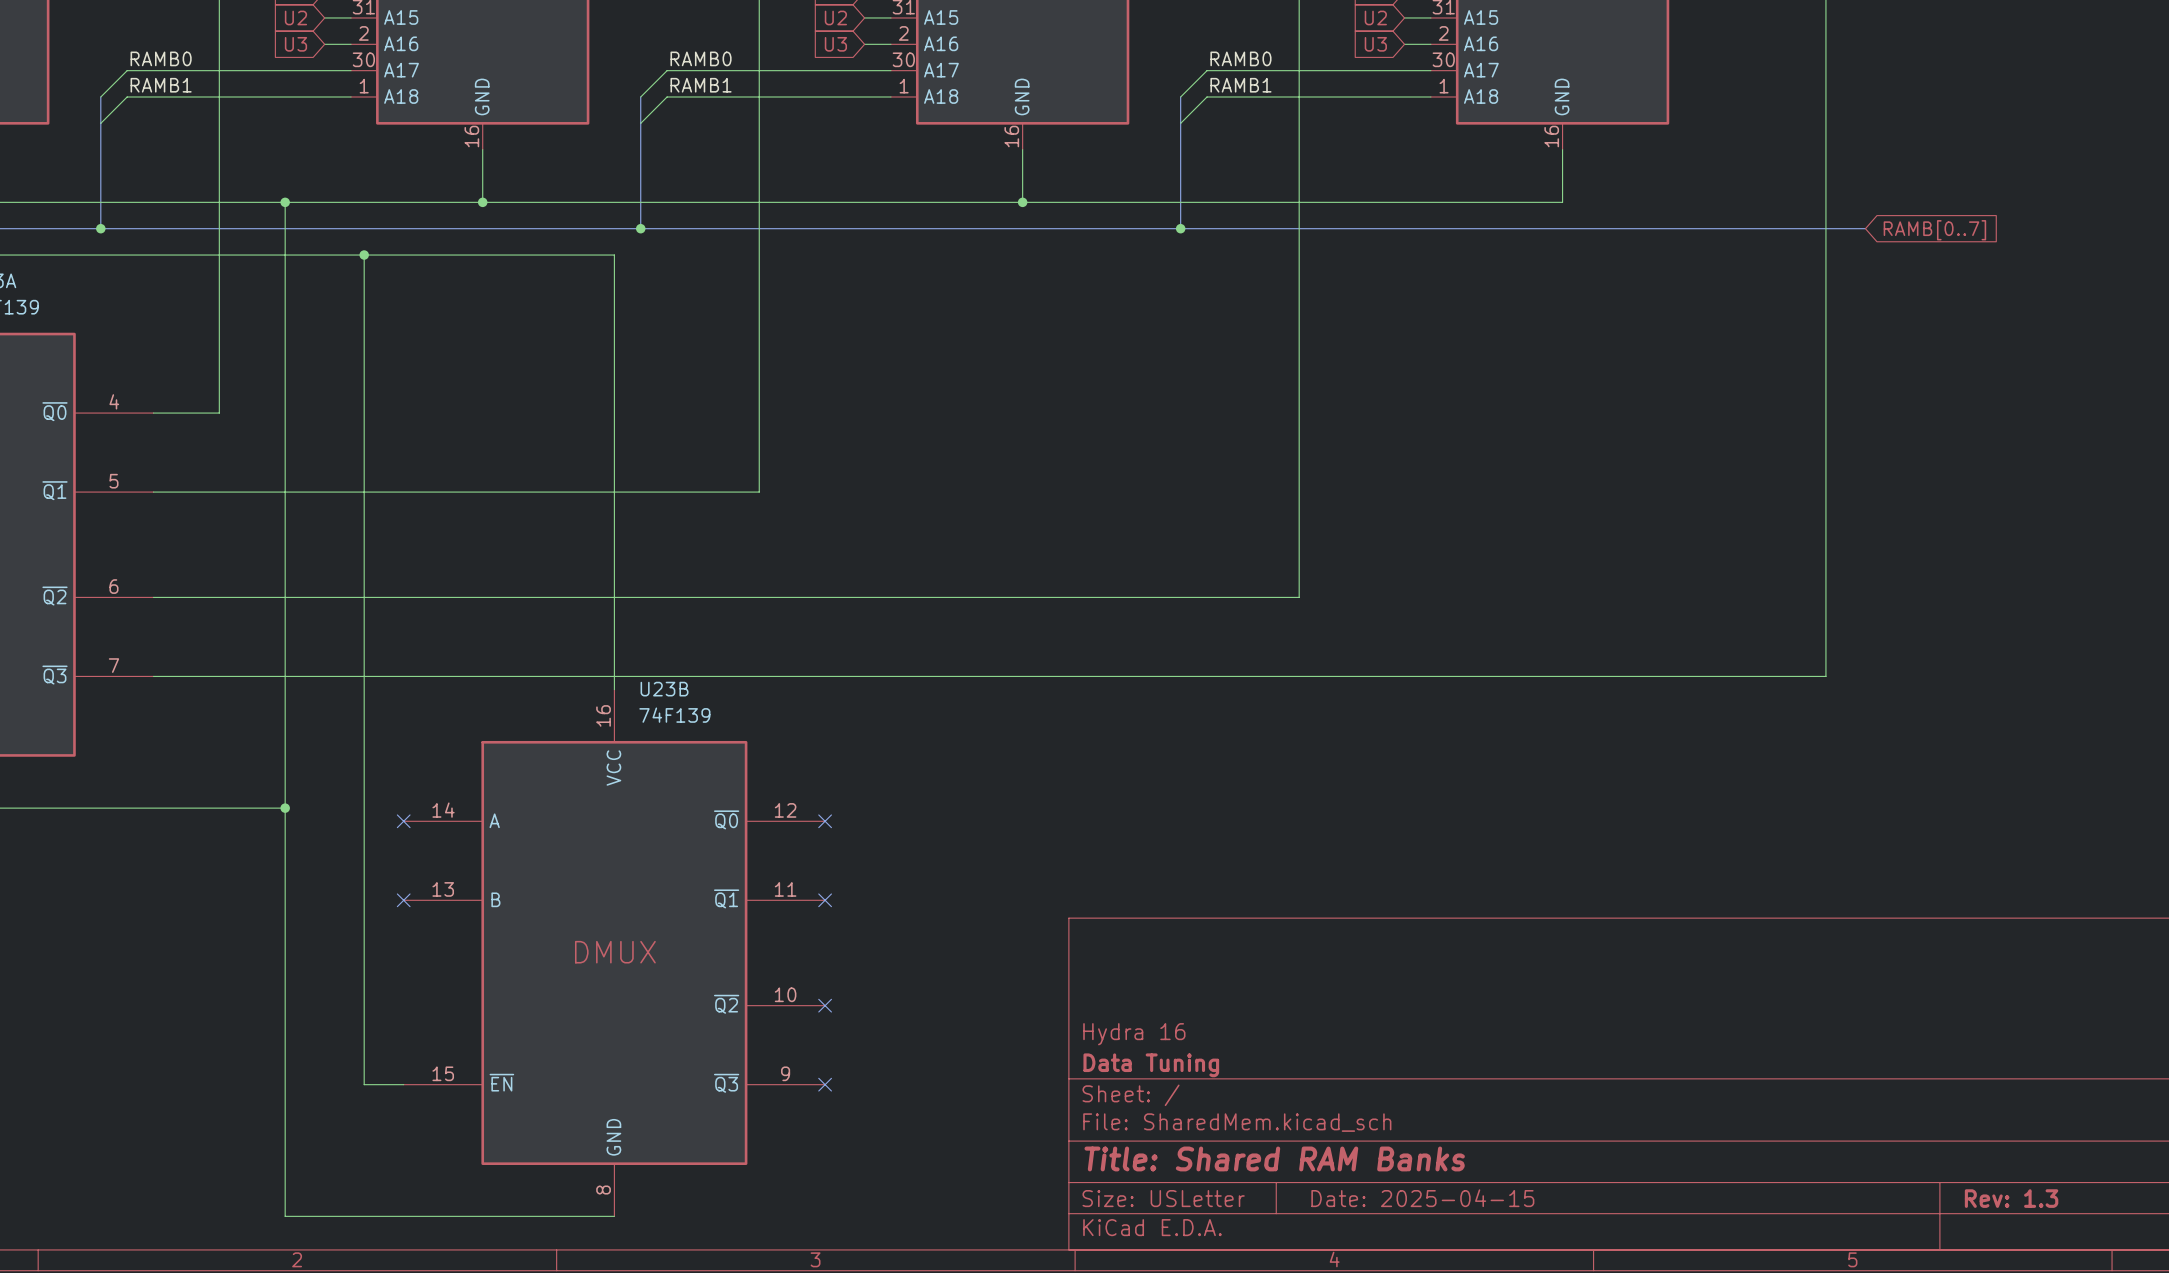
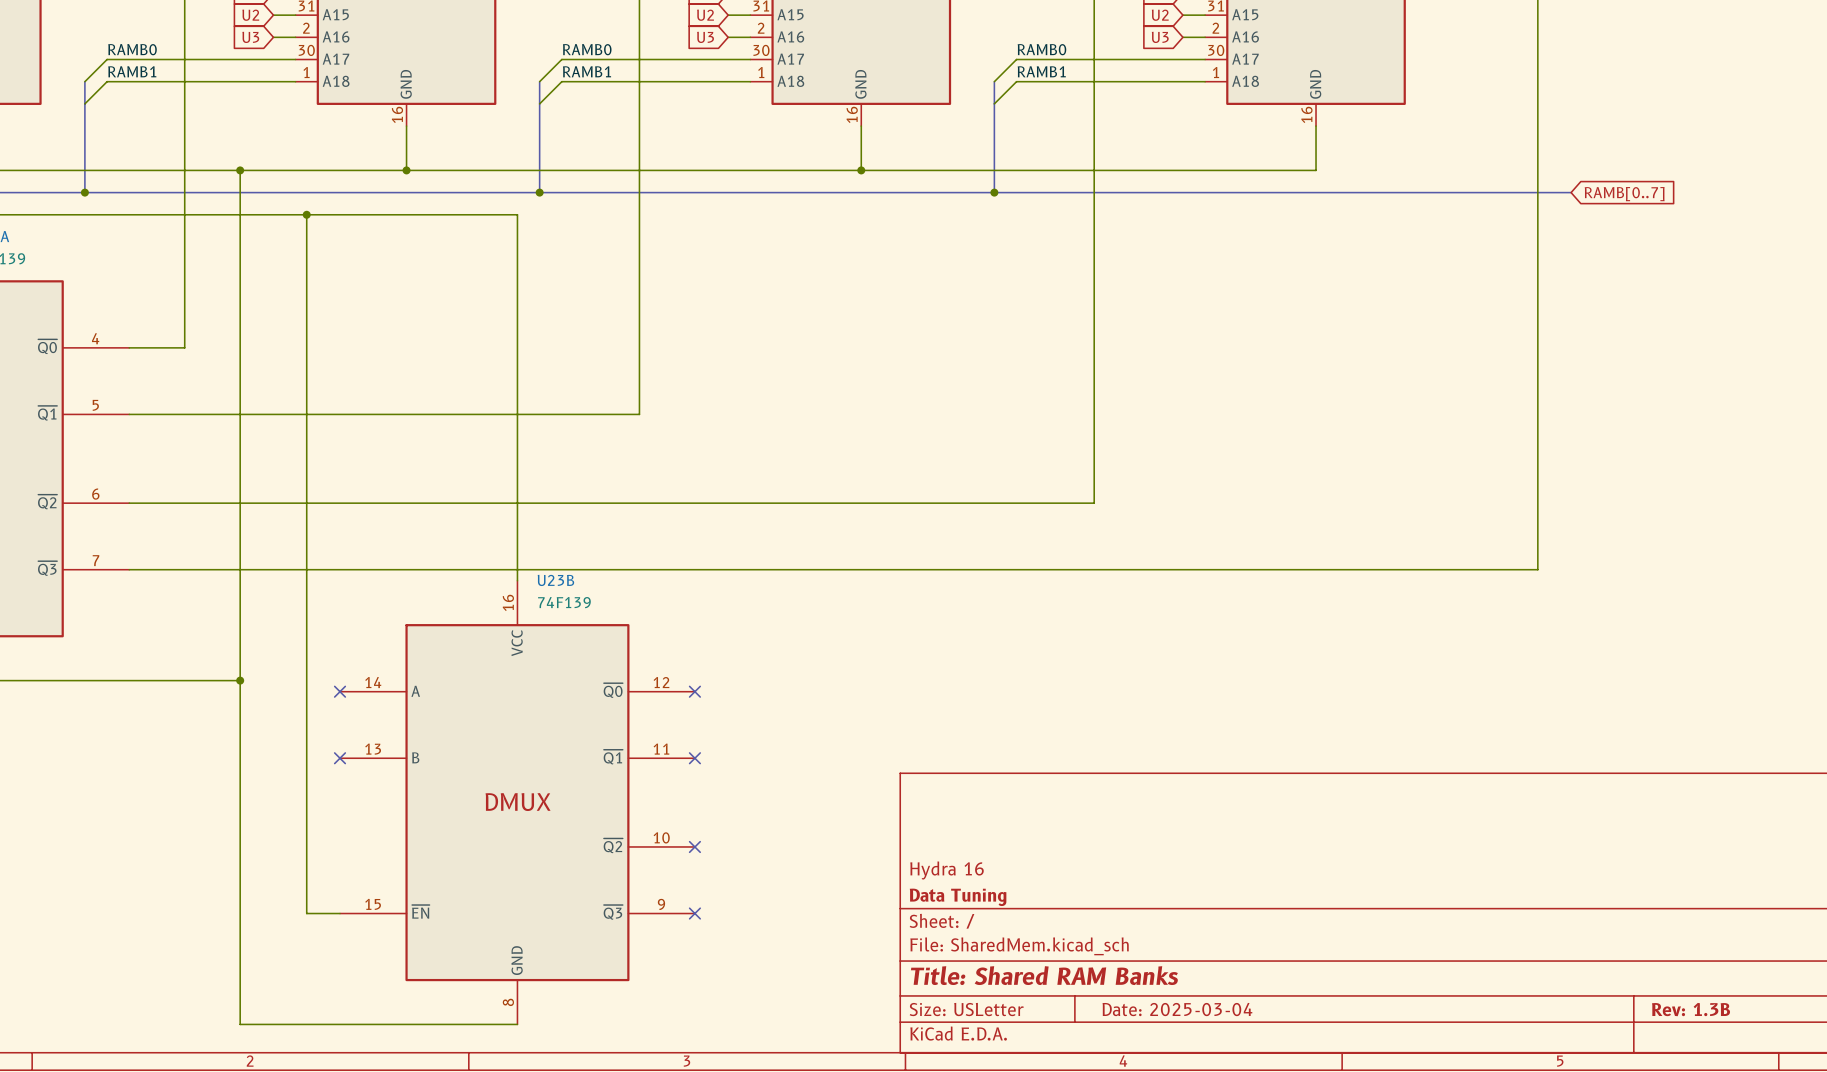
title block: Date: 2025-04-15 (1422, 1198) -> Date: 2025-03-04 (1177, 1009)
title block: Rev: 1.3 (2011, 1198) -> Rev: 1.3B (1691, 1009)

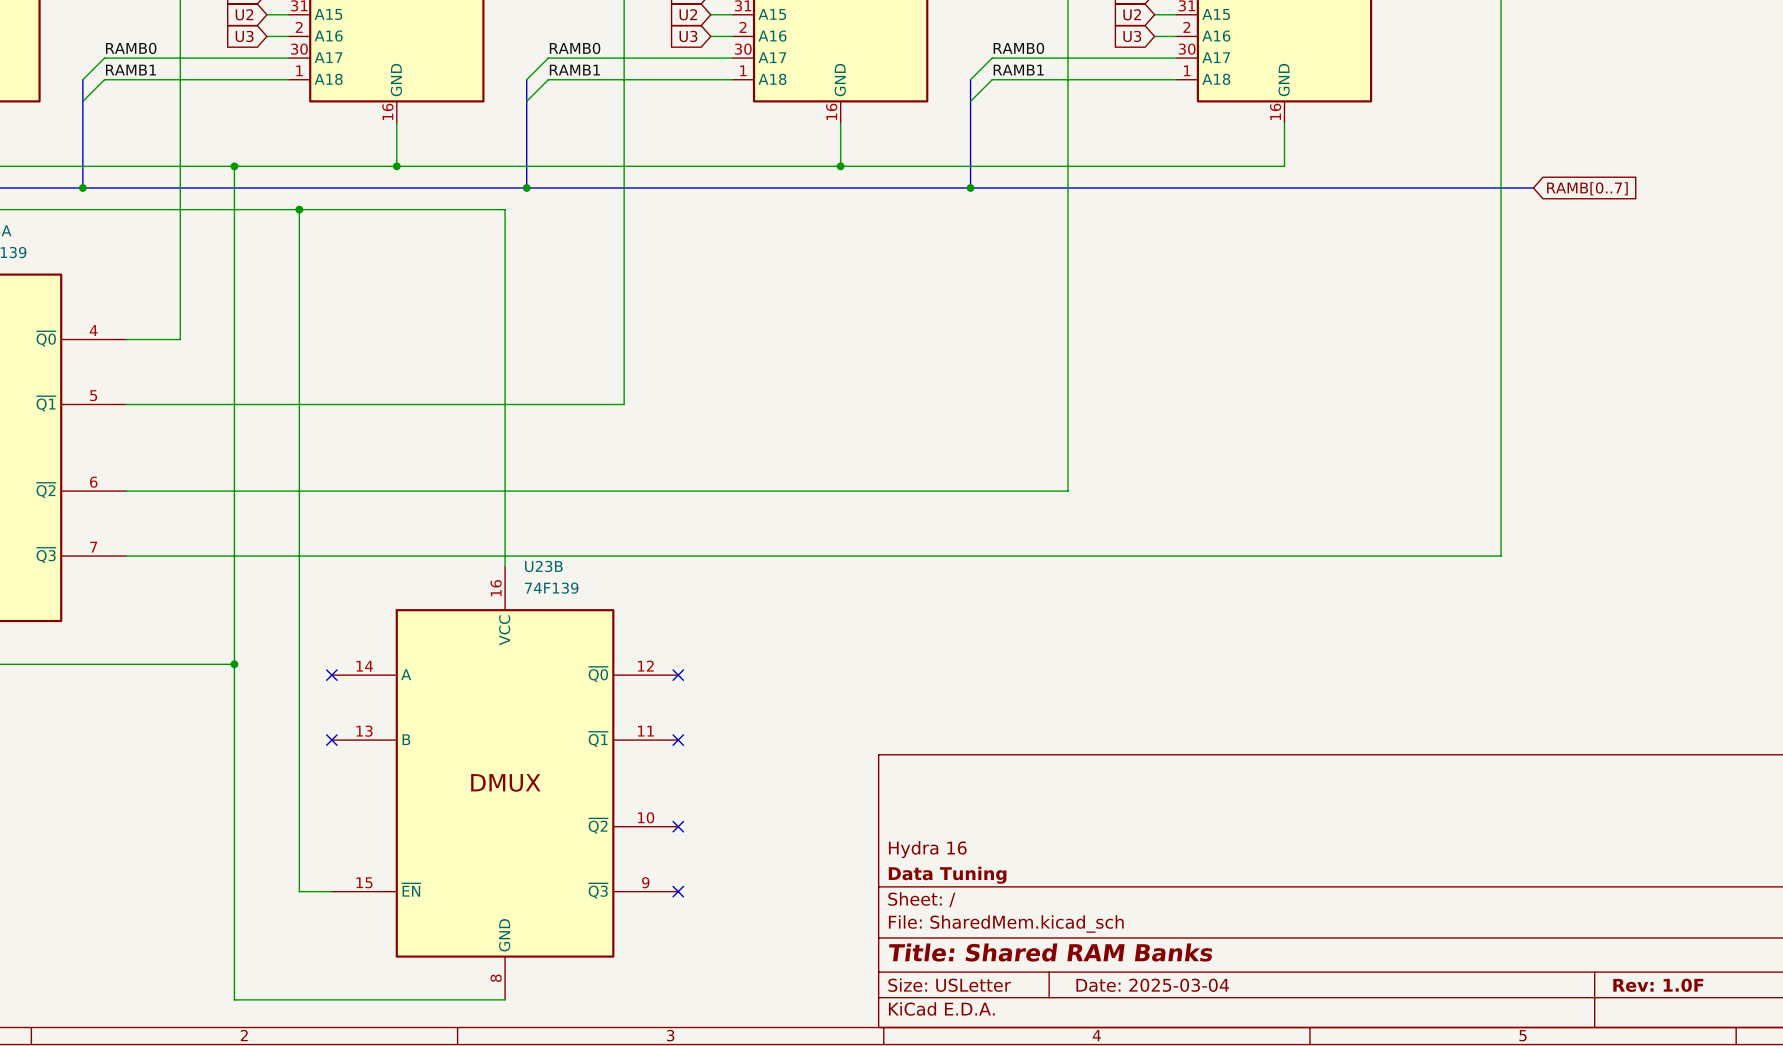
title block: Rev: 1.3B (1691, 1009) -> Rev: 1.0F (1658, 985)

